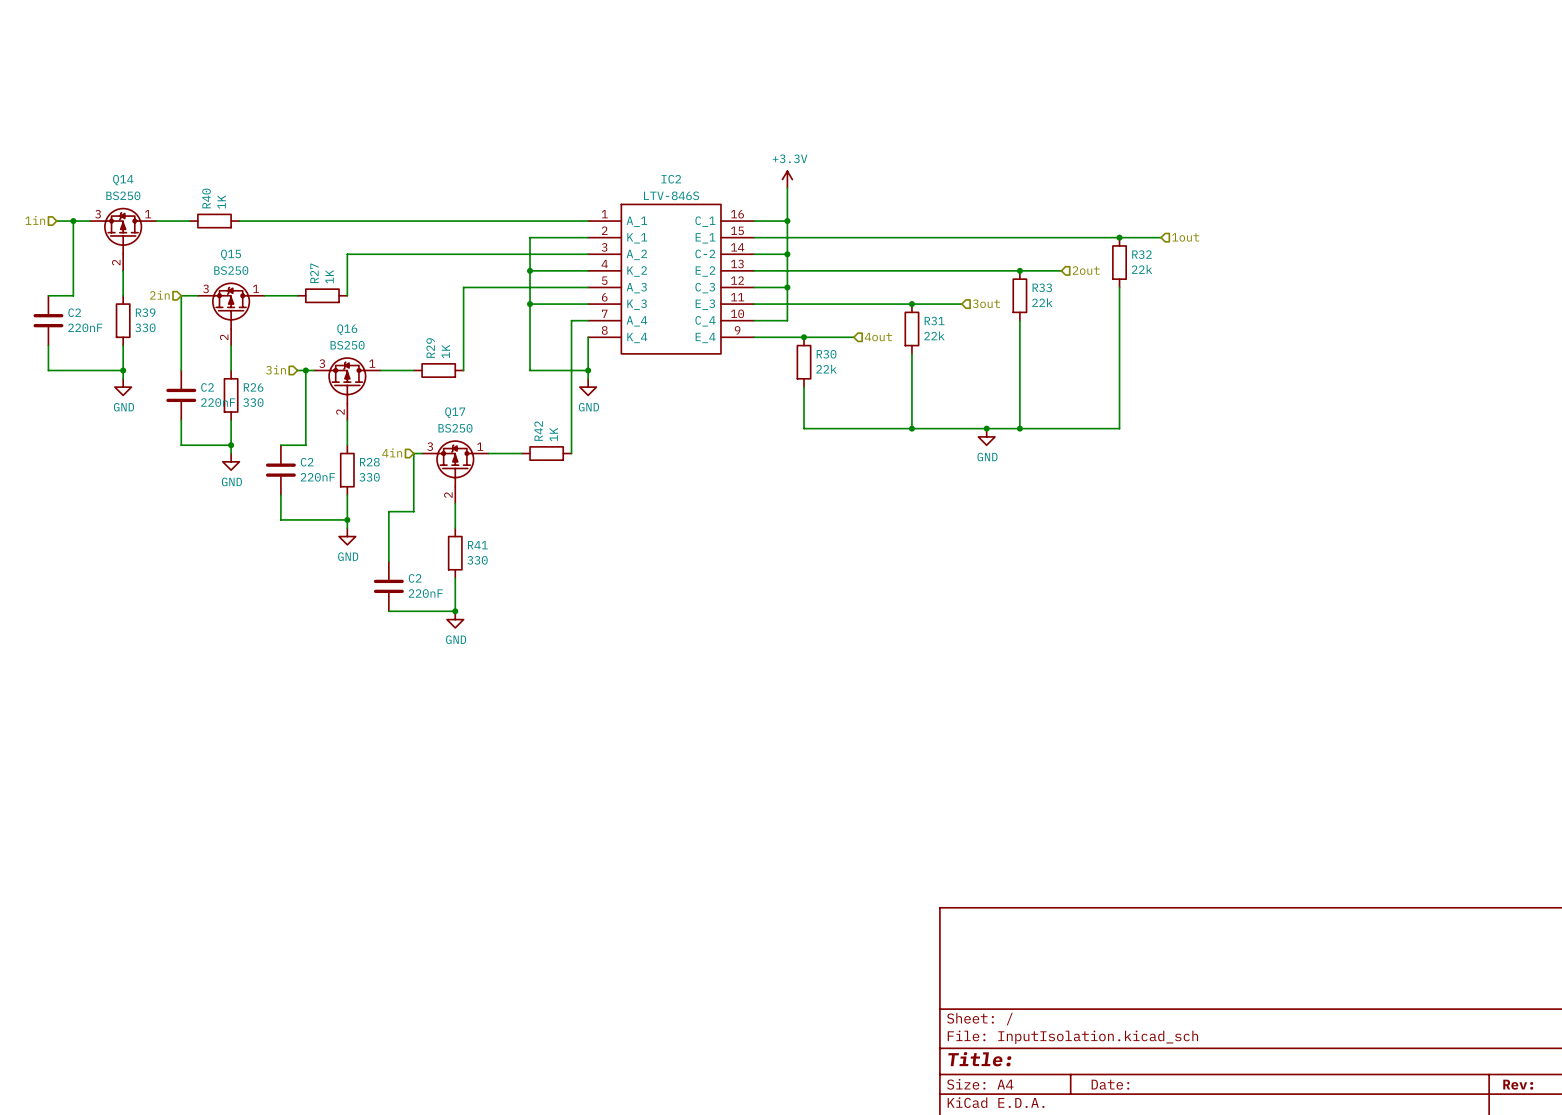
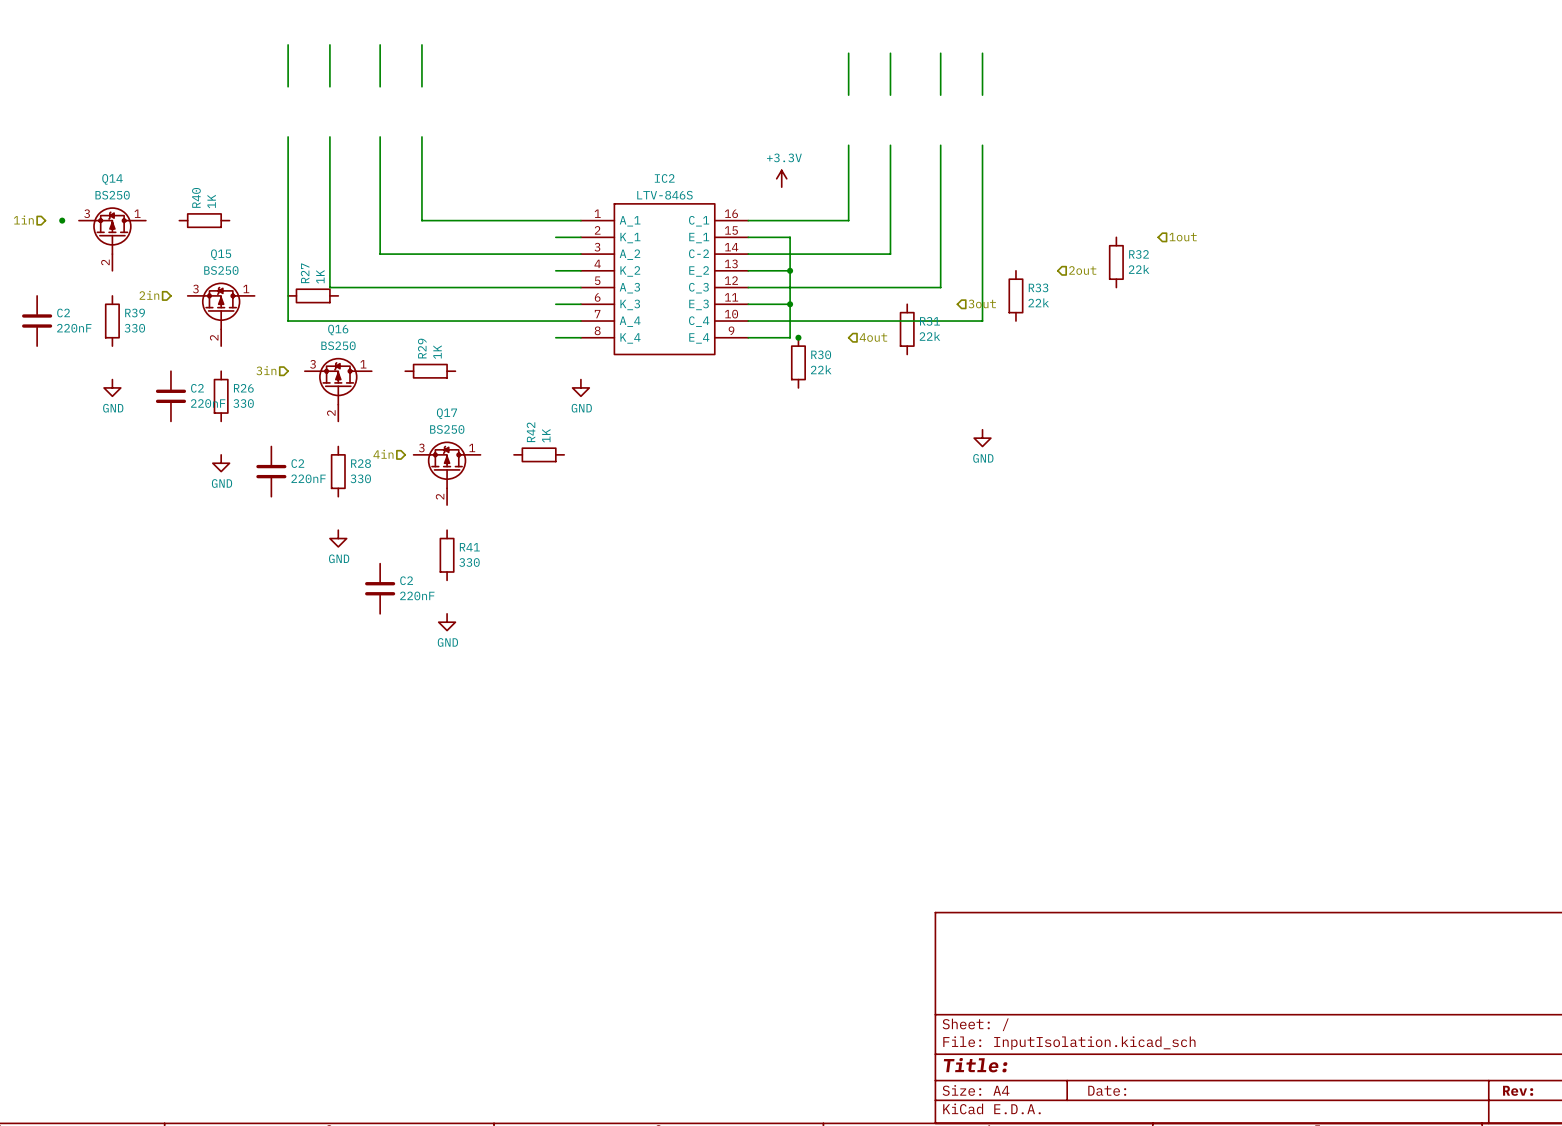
wire: none -> (288, 44) (288, 86)
wire: none -> (329, 44) (329, 86)
wire: none -> (380, 44) (380, 86)
wire: none -> (421, 44) (421, 86)
wire: none -> (848, 53) (848, 95)
wire: none -> (890, 53) (890, 95)
wire: none -> (940, 53) (940, 95)
wire: none -> (982, 53) (982, 95)
wire: none -> (848, 145) (848, 220) (781, 220)
wire: none -> (890, 145) (890, 254) (781, 254)
wire: none -> (940, 145) (940, 287) (781, 287)
wire: (787, 187) (787, 320) -> (982, 145) (982, 321) (781, 321)
wire: (56, 221) (89, 221) -> none
wire: (73, 221) (73, 295) (48, 295) -> none
wire: (156, 221) (189, 221) -> none
wire: (239, 221) (430, 221) -> (421, 136) (421, 220)
junction: (787, 221) -> none
wire: (563, 237) (530, 237) (530, 370) (588, 370) -> none
wire: (795, 237) (1161, 237) -> none
junction: (1119, 237) -> none
wire: (388, 254) (347, 254) (347, 295) -> (380, 254) (380, 136)
junction: (787, 254) -> none
wire: (123, 270) (123, 295) -> none
wire: (530, 270) (563, 270) -> none
junction: (530, 270) -> none
wire: (795, 270) (1061, 270) -> none
junction: none -> (790, 270)
junction: (1019, 270) -> none
wire: (463, 287) (463, 370) -> (455, 287) (329, 287) (329, 136)
junction: (787, 287) -> none
wire: (1119, 287) (1119, 428) (804, 428) (804, 387) -> none
wire: (197, 295) (181, 295) (181, 370) -> none
wire: (264, 295) (297, 295) -> none
wire: (530, 304) (563, 304) -> none
junction: (530, 304) -> none
wire: (795, 304) (961, 304) -> none
junction: none -> (790, 304)
junction: (911, 304) -> none
wire: (571, 320) (571, 453) -> (564, 321) (288, 321) (288, 136)
wire: (1019, 320) (1019, 428) -> none
wire: (588, 337) (588, 378) -> (580, 337) (555, 337)
wire: (795, 337) (853, 337) -> (790, 337) (790, 237)
wire: (48, 345) (48, 370) (123, 370) -> none
wire: (123, 345) (123, 378) -> none
wire: (231, 345) (231, 370) -> none
wire: (911, 353) (911, 428) -> none
junction: (123, 370) -> none
wire: (297, 370) (314, 370) -> none
wire: (305, 370) (305, 445) (280, 445) -> none
junction: (305, 370) -> none
wire: (380, 370) (413, 370) -> none
junction: (588, 370) -> none
wire: (181, 420) (181, 445) (231, 445) -> none
wire: (231, 420) (231, 453) -> none
wire: (347, 420) (347, 445) -> none
junction: (911, 428) -> none
junction: (986, 428) -> none
junction: (1019, 428) -> none
junction: (231, 445) -> none
wire: (422, 453) (413, 453) (413, 511) (388, 511) (388, 561) -> none
wire: (488, 453) (521, 453) -> none
wire: (280, 495) (280, 519) (347, 519) -> none
wire: (347, 495) (347, 528) -> none
wire: (455, 503) (455, 528) -> none
junction: (347, 519) -> none
wire: (455, 578) (455, 611) (388, 611) -> none
junction: (455, 611) -> none

